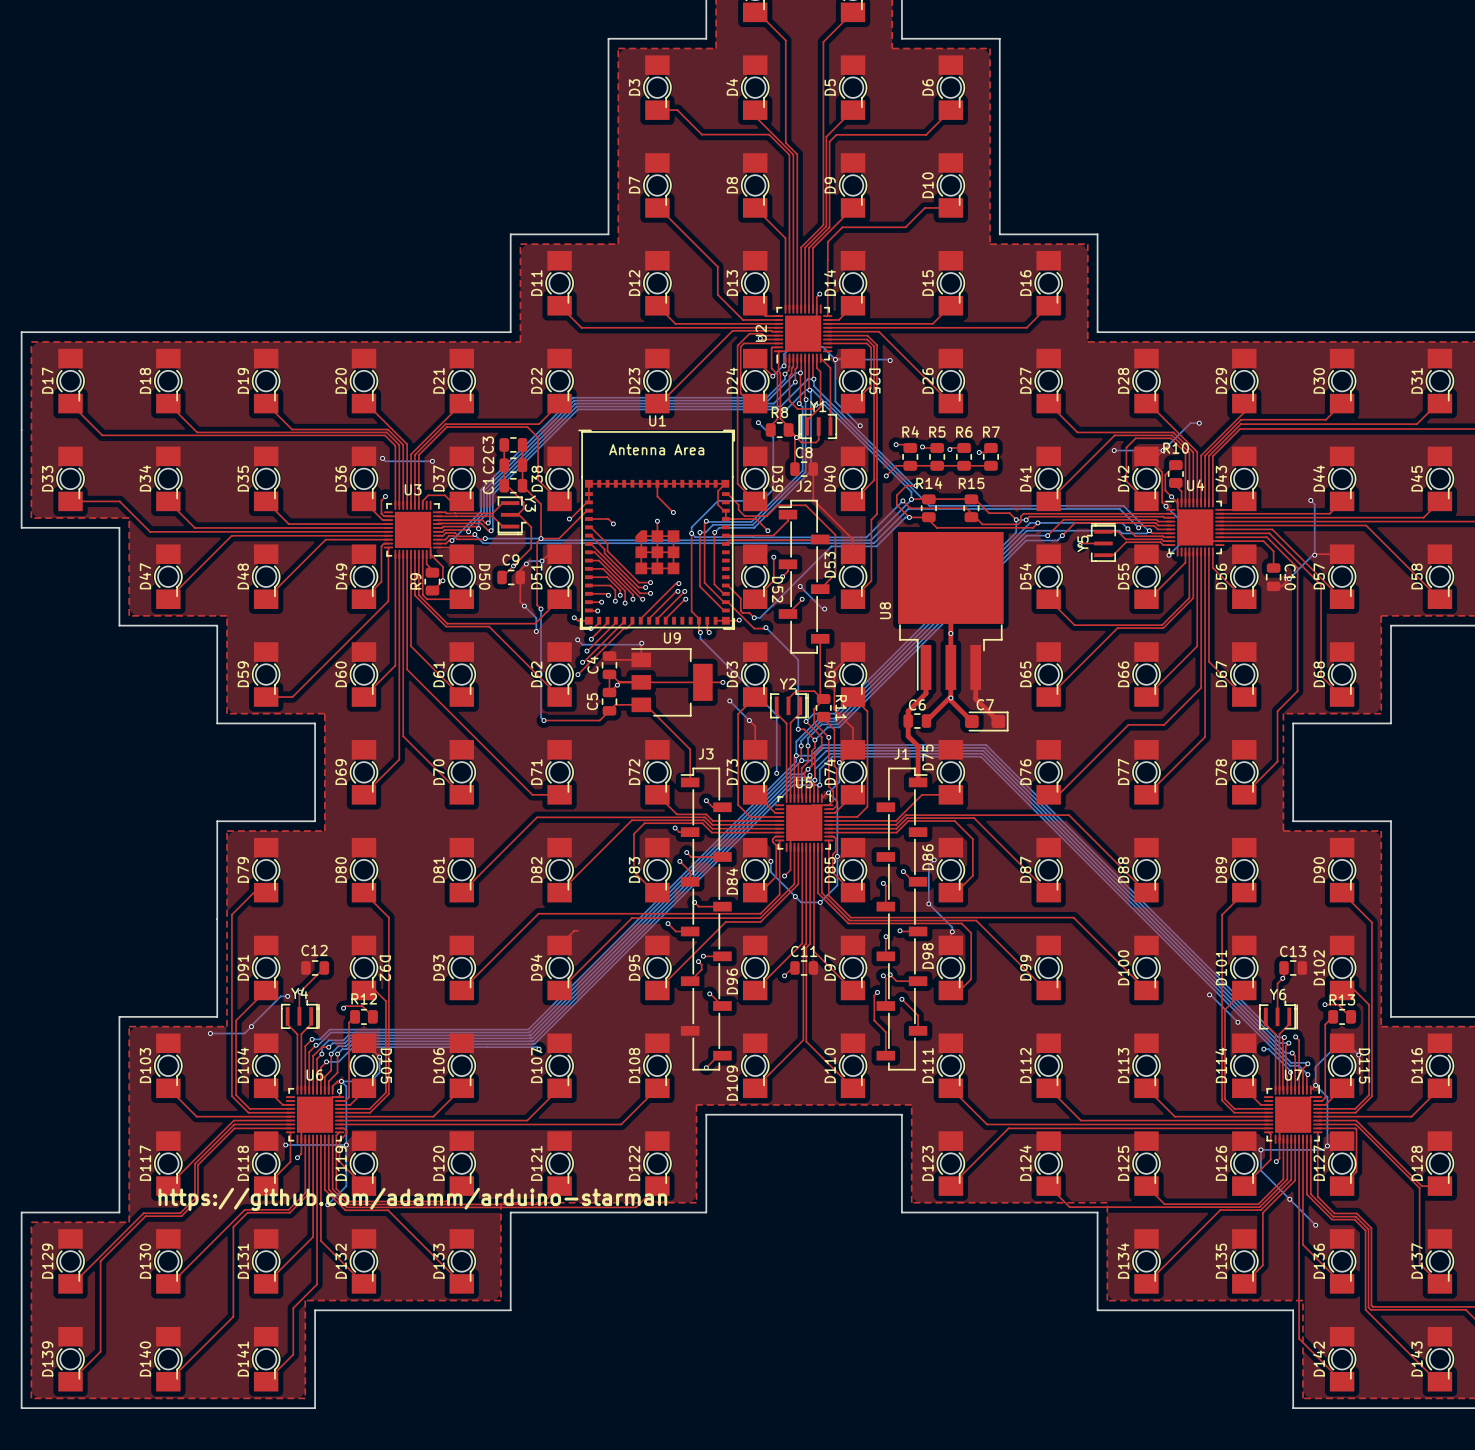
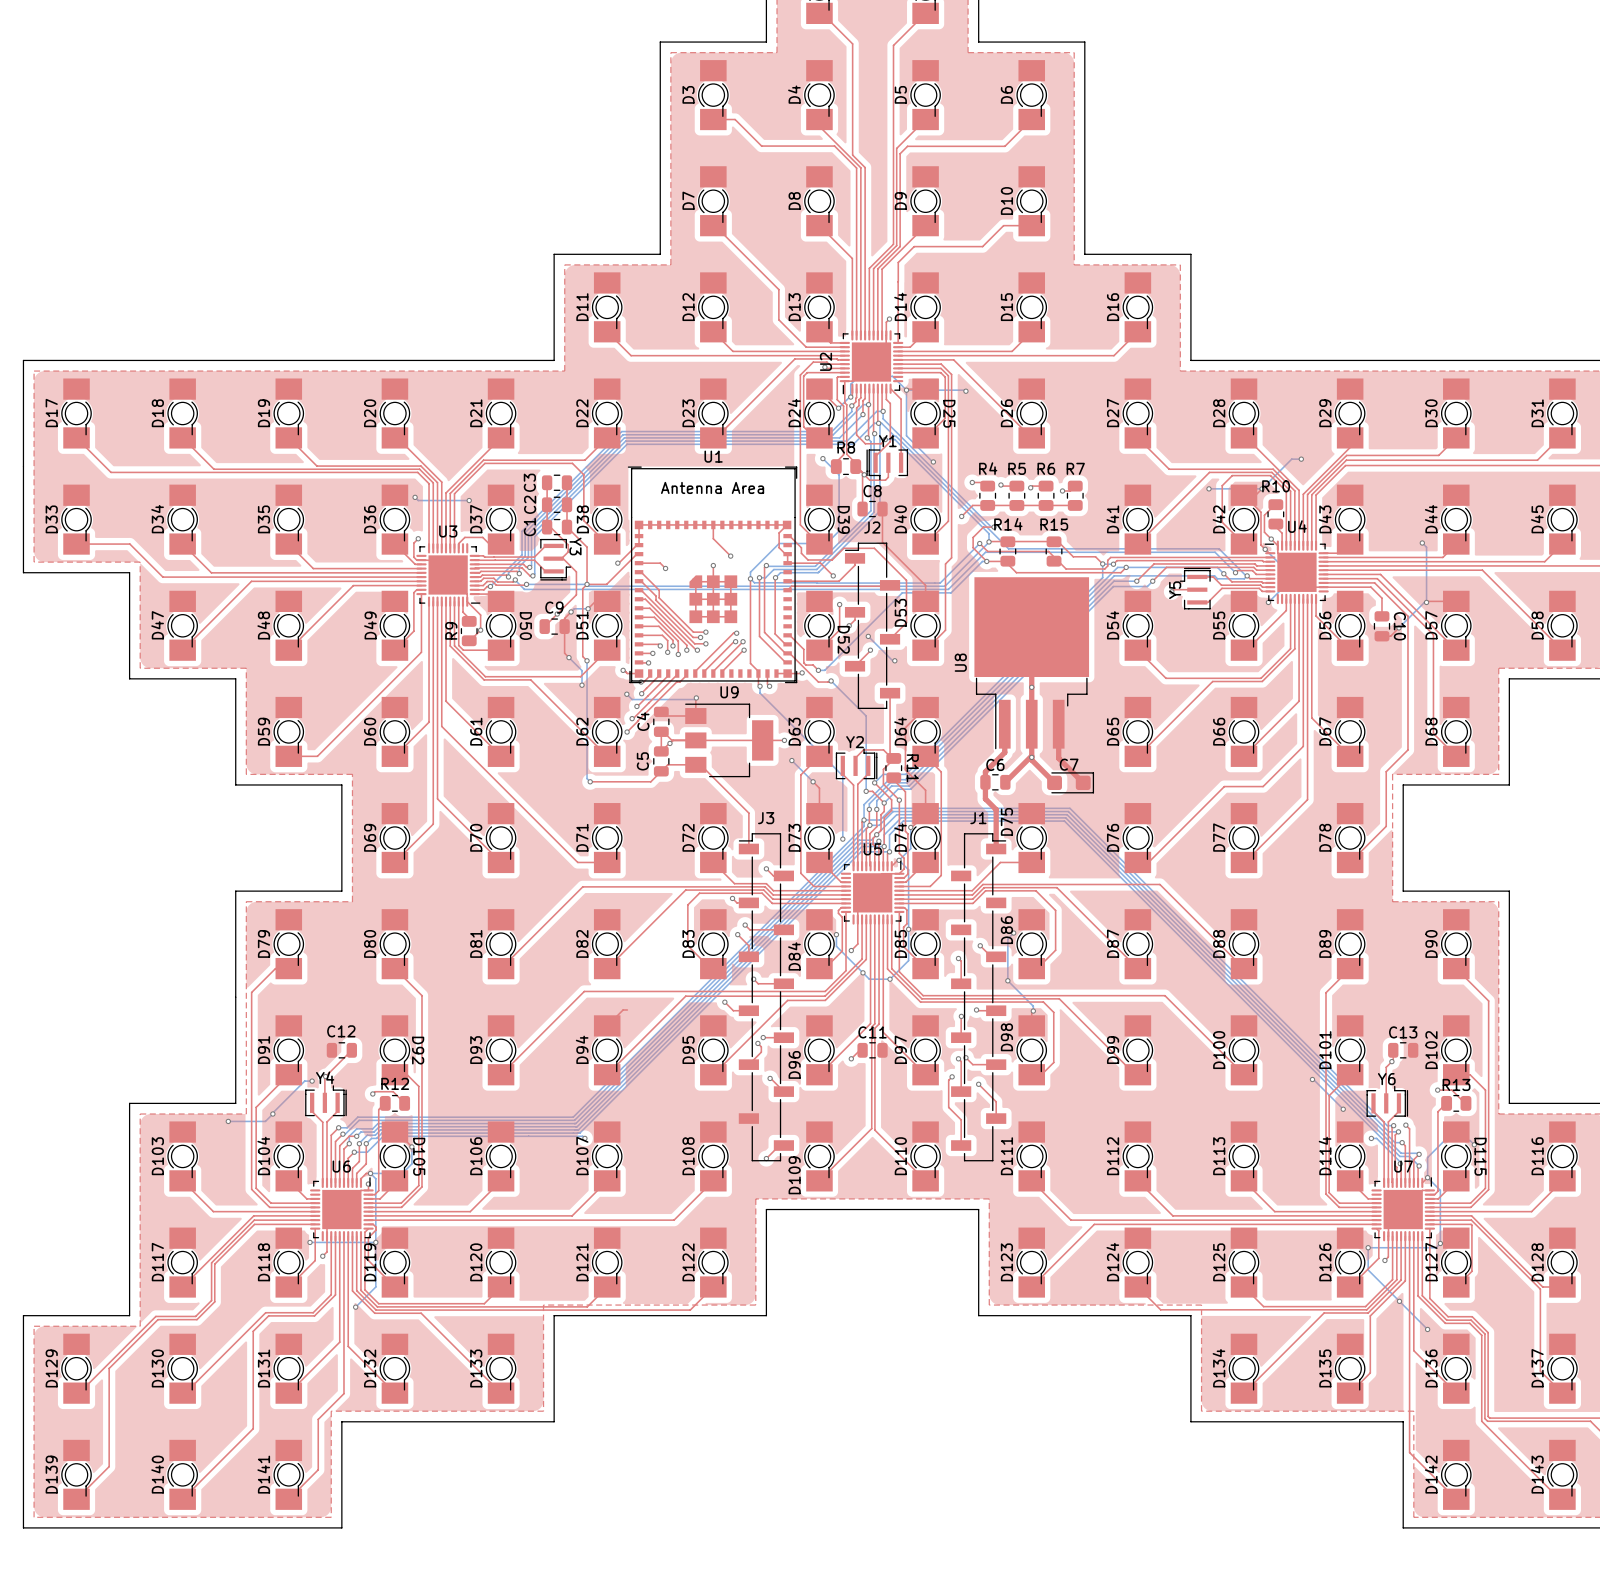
text: https://github.com/adamm/arduino-starman (412, 1199) -> none

